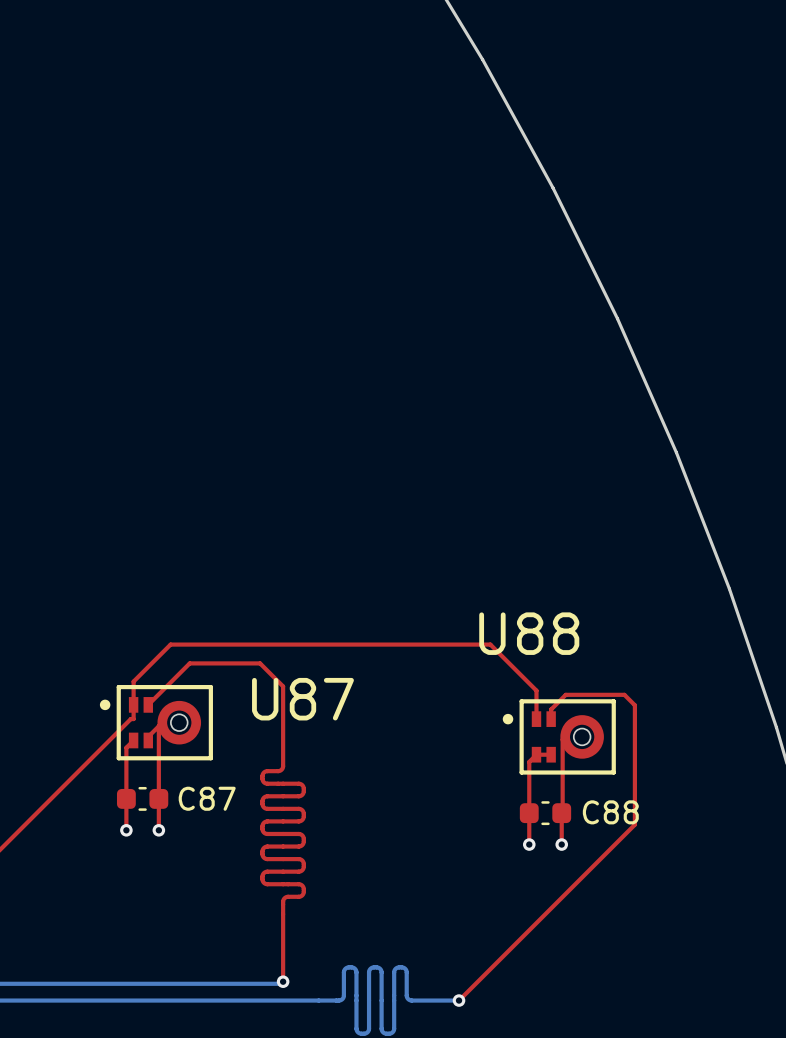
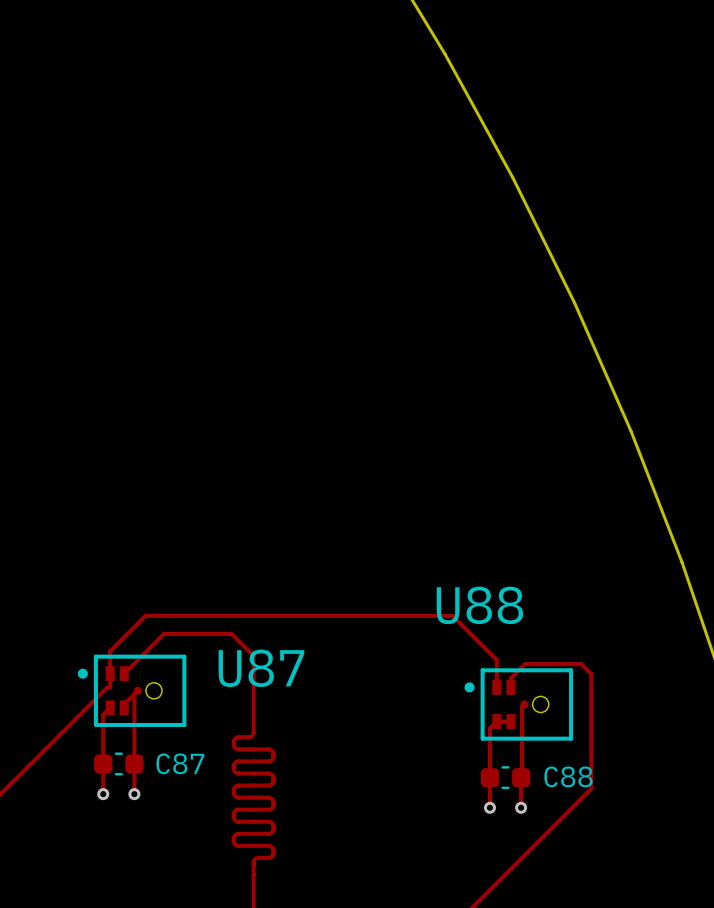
U87 footprint: [99, 684, 213, 761] -> [77, 654, 187, 727]
U88 footprint: [502, 699, 616, 775] -> [464, 668, 574, 741]

